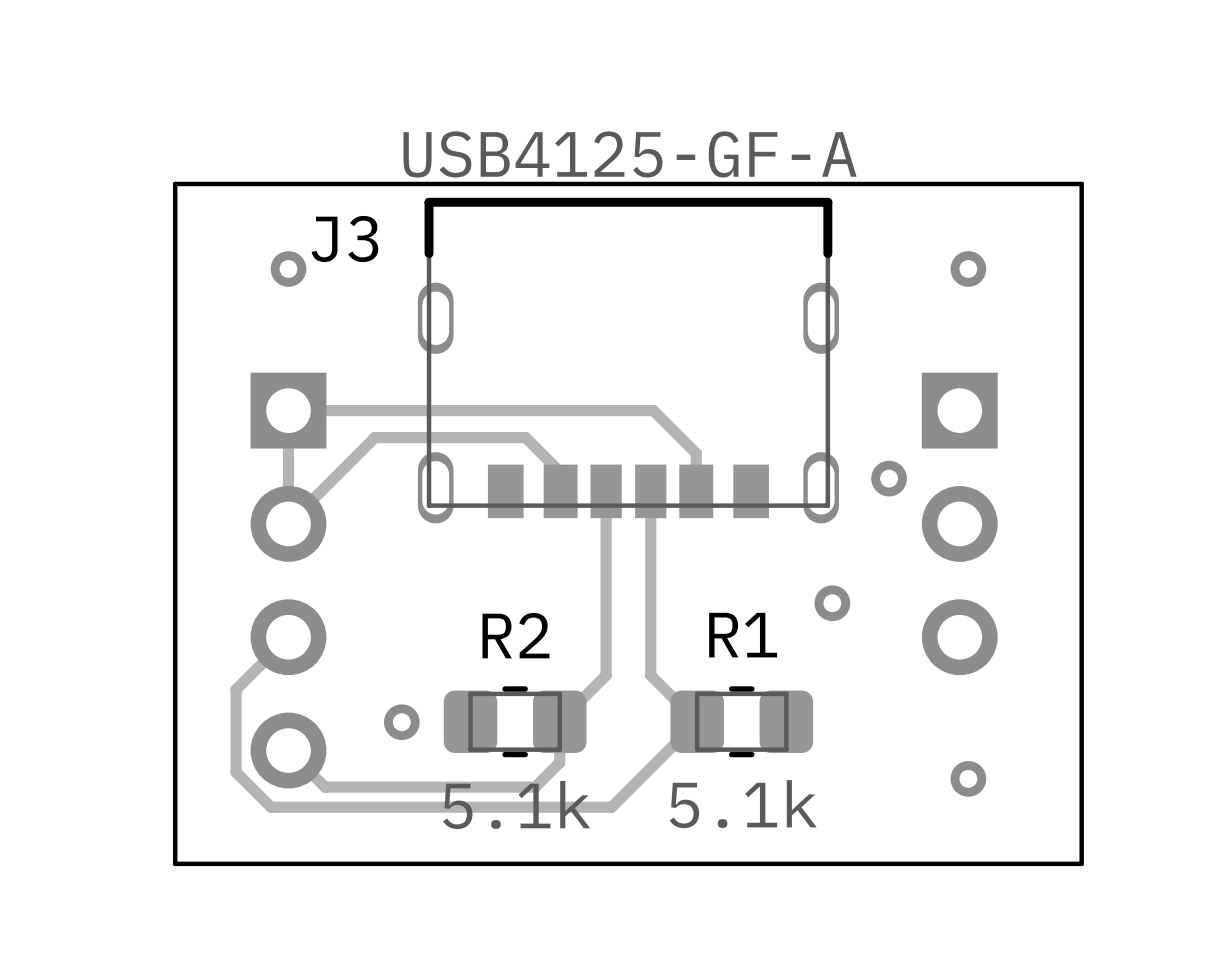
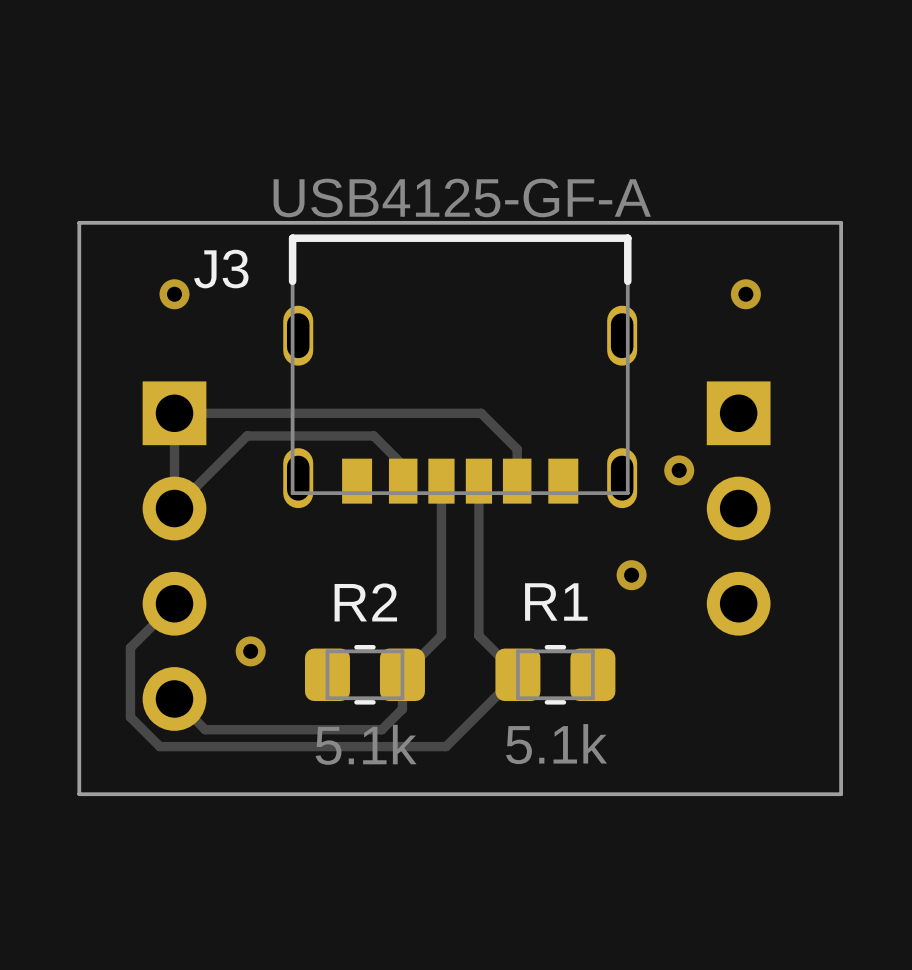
via position: (401, 722) -> (250, 651)
via: (968, 778) -> none

